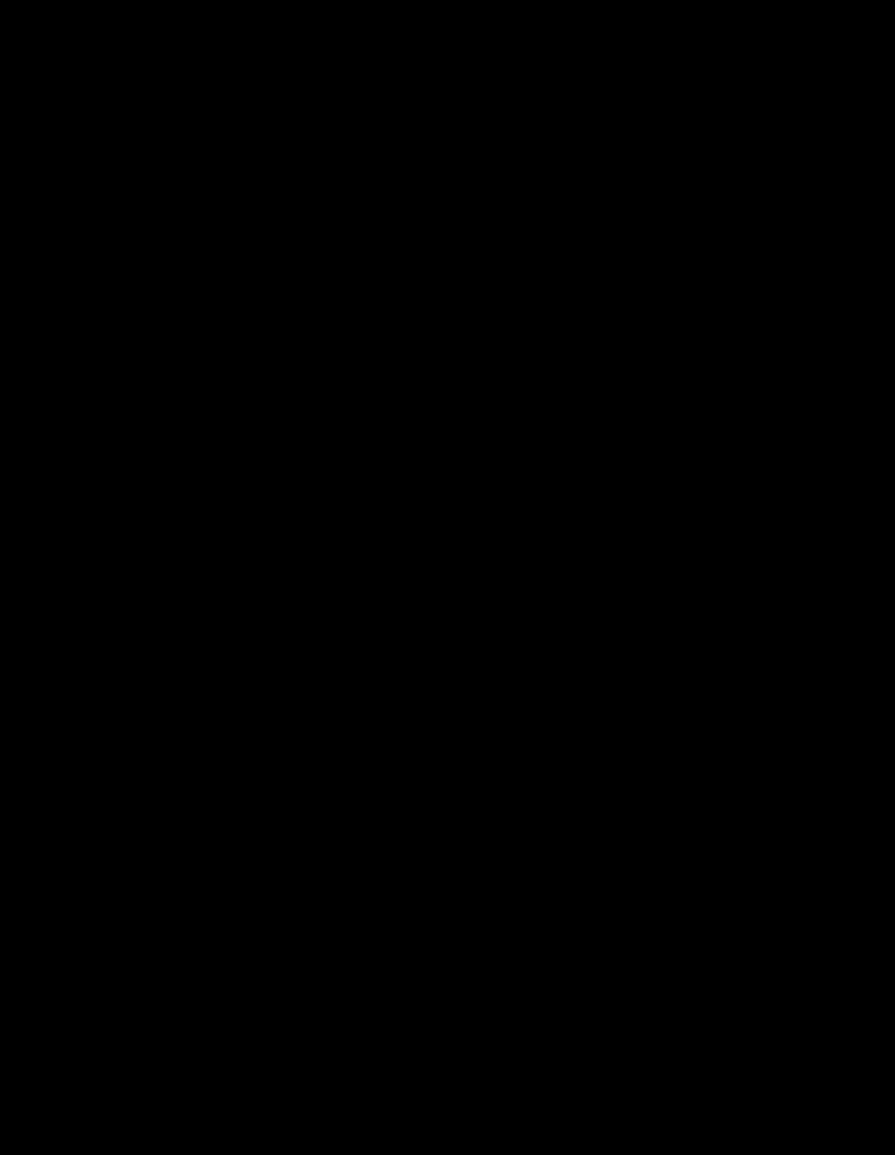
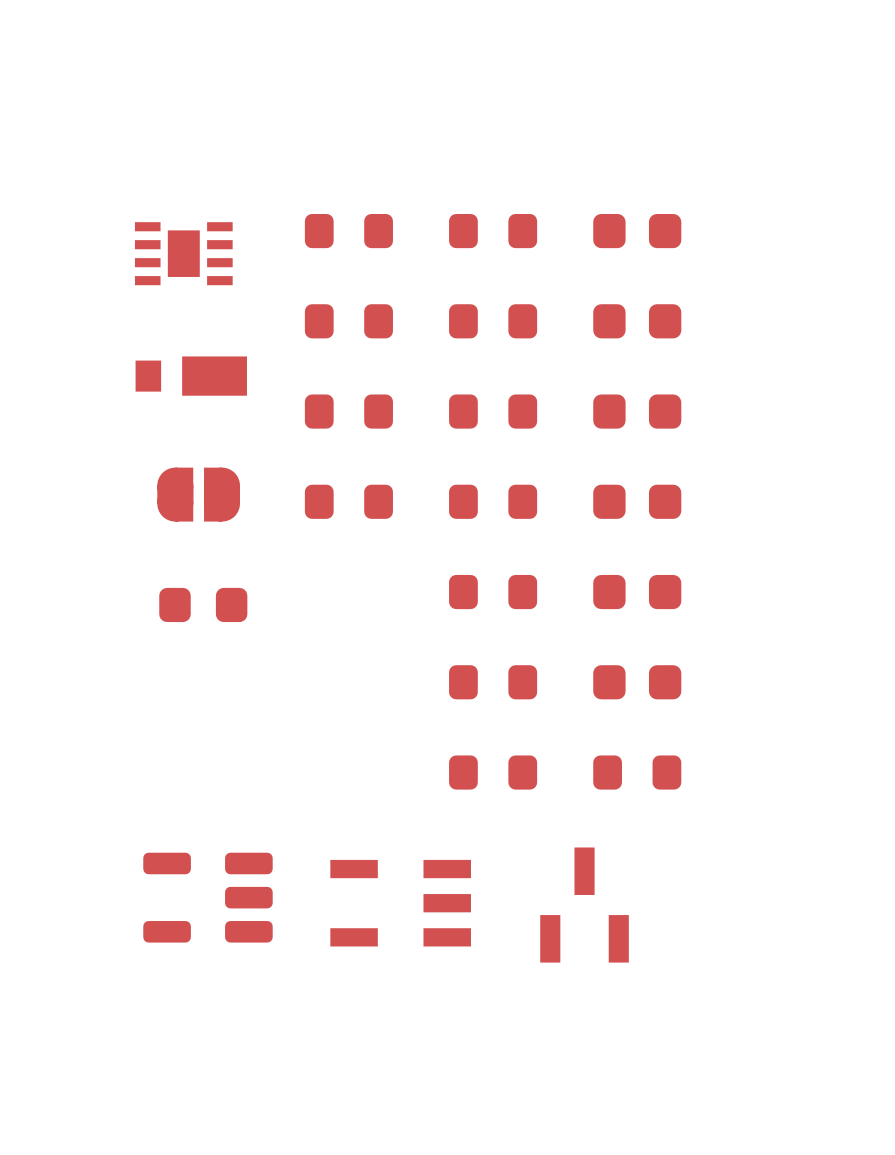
part: none -> (348, 231)
part: none -> (493, 231)
part: none -> (637, 231)
part: none -> (183, 253)
part: none -> (348, 321)
part: none -> (493, 321)
part: none -> (637, 321)
part: none -> (191, 376)
part: none -> (348, 411)
part: none -> (493, 411)
part: none -> (637, 411)
part: none -> (198, 494)
part: none -> (348, 501)
part: none -> (493, 501)
part: none -> (637, 501)
part: none -> (493, 592)
part: none -> (637, 592)
part: none -> (203, 604)
part: none -> (493, 682)
part: none -> (637, 682)
part: none -> (493, 772)
part: none -> (637, 772)
part: none -> (207, 897)
part: none -> (400, 903)
part: none -> (584, 905)

